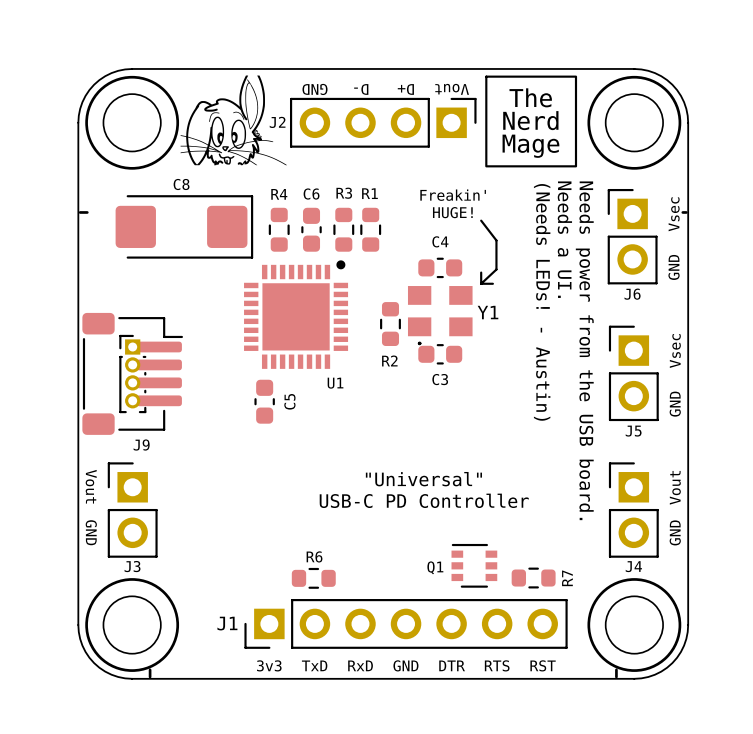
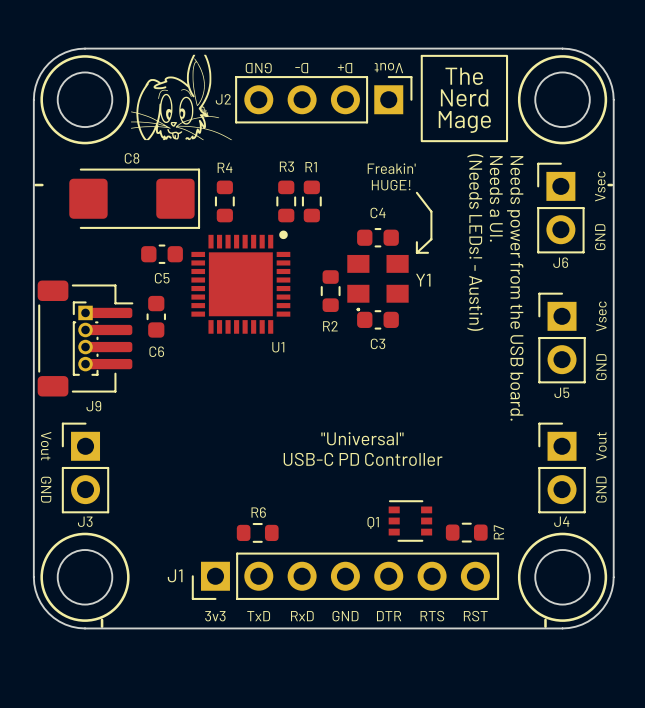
C6 name position: C6 (311, 194) -> C6 (156, 351)
C6 position: (311, 229) -> (156, 316)
C5 rotation: 0° (264, 401) -> 90° clockwise (162, 254)
C5 position: (264, 401) -> (162, 254)

